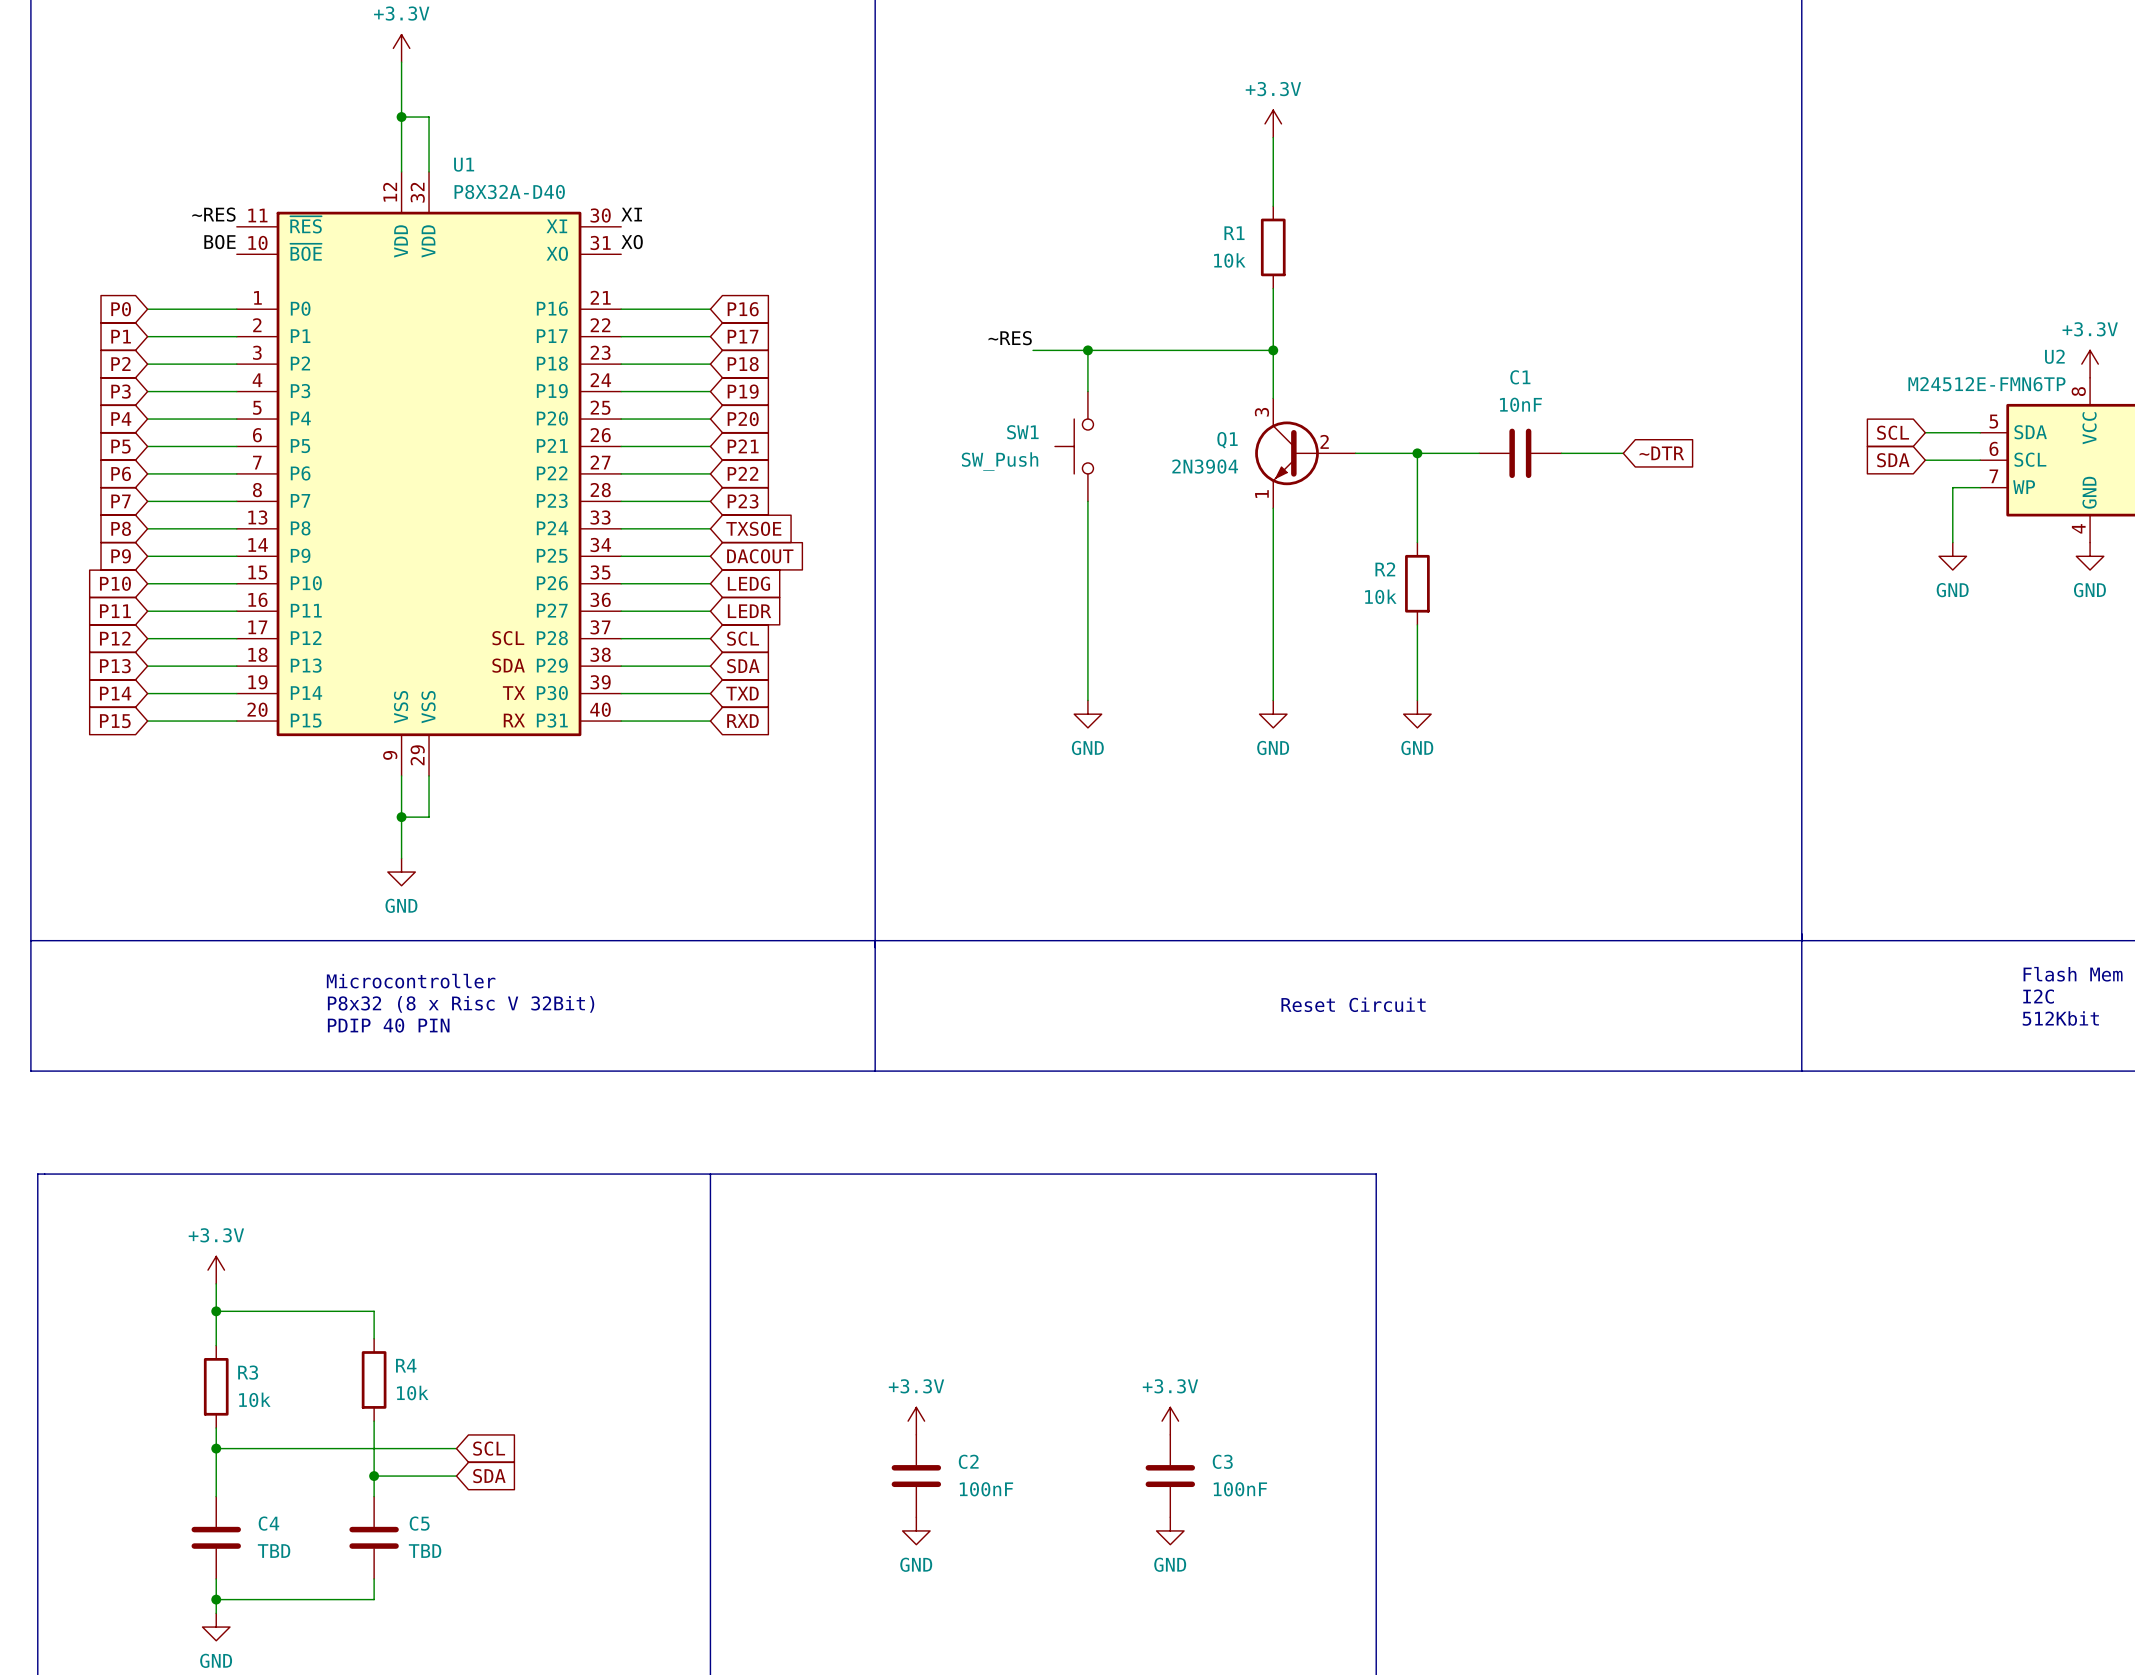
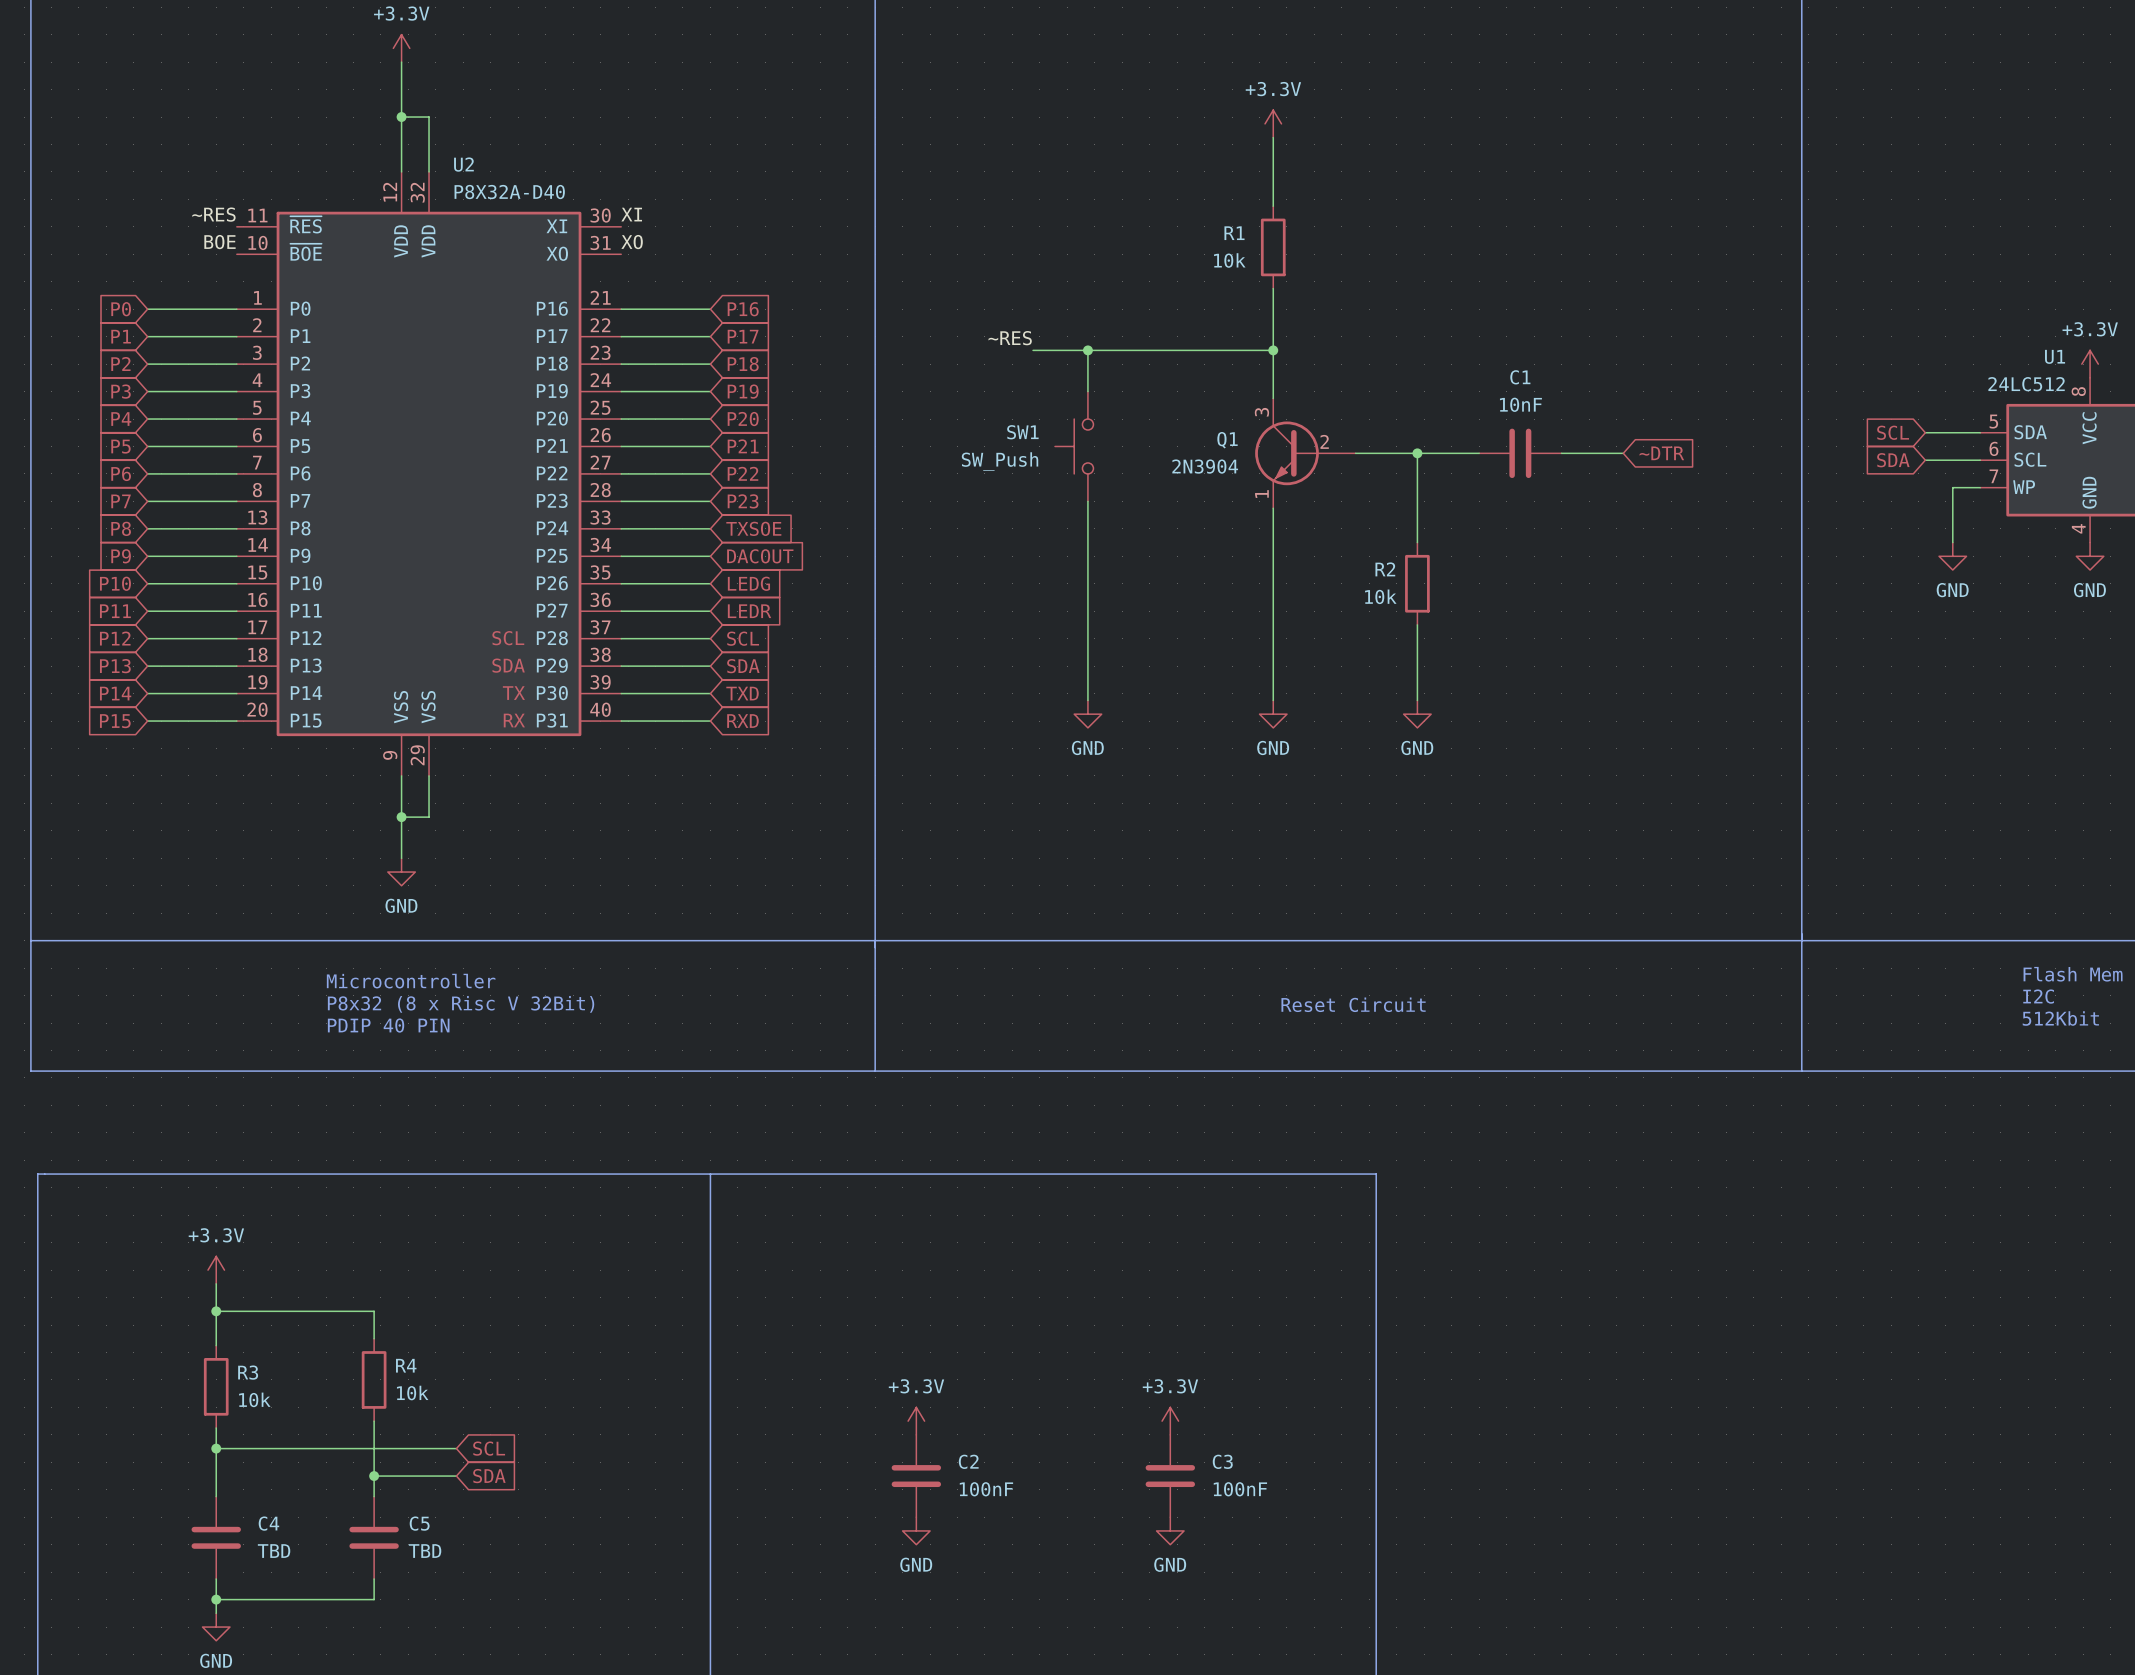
U1 name: U1 (464, 164) -> U2 (463, 164)
U2 name: U2 (2054, 356) -> U1 (2055, 356)
U2 value: M24512E-FMN6TP (1986, 384) -> 24LC512 (2026, 384)

